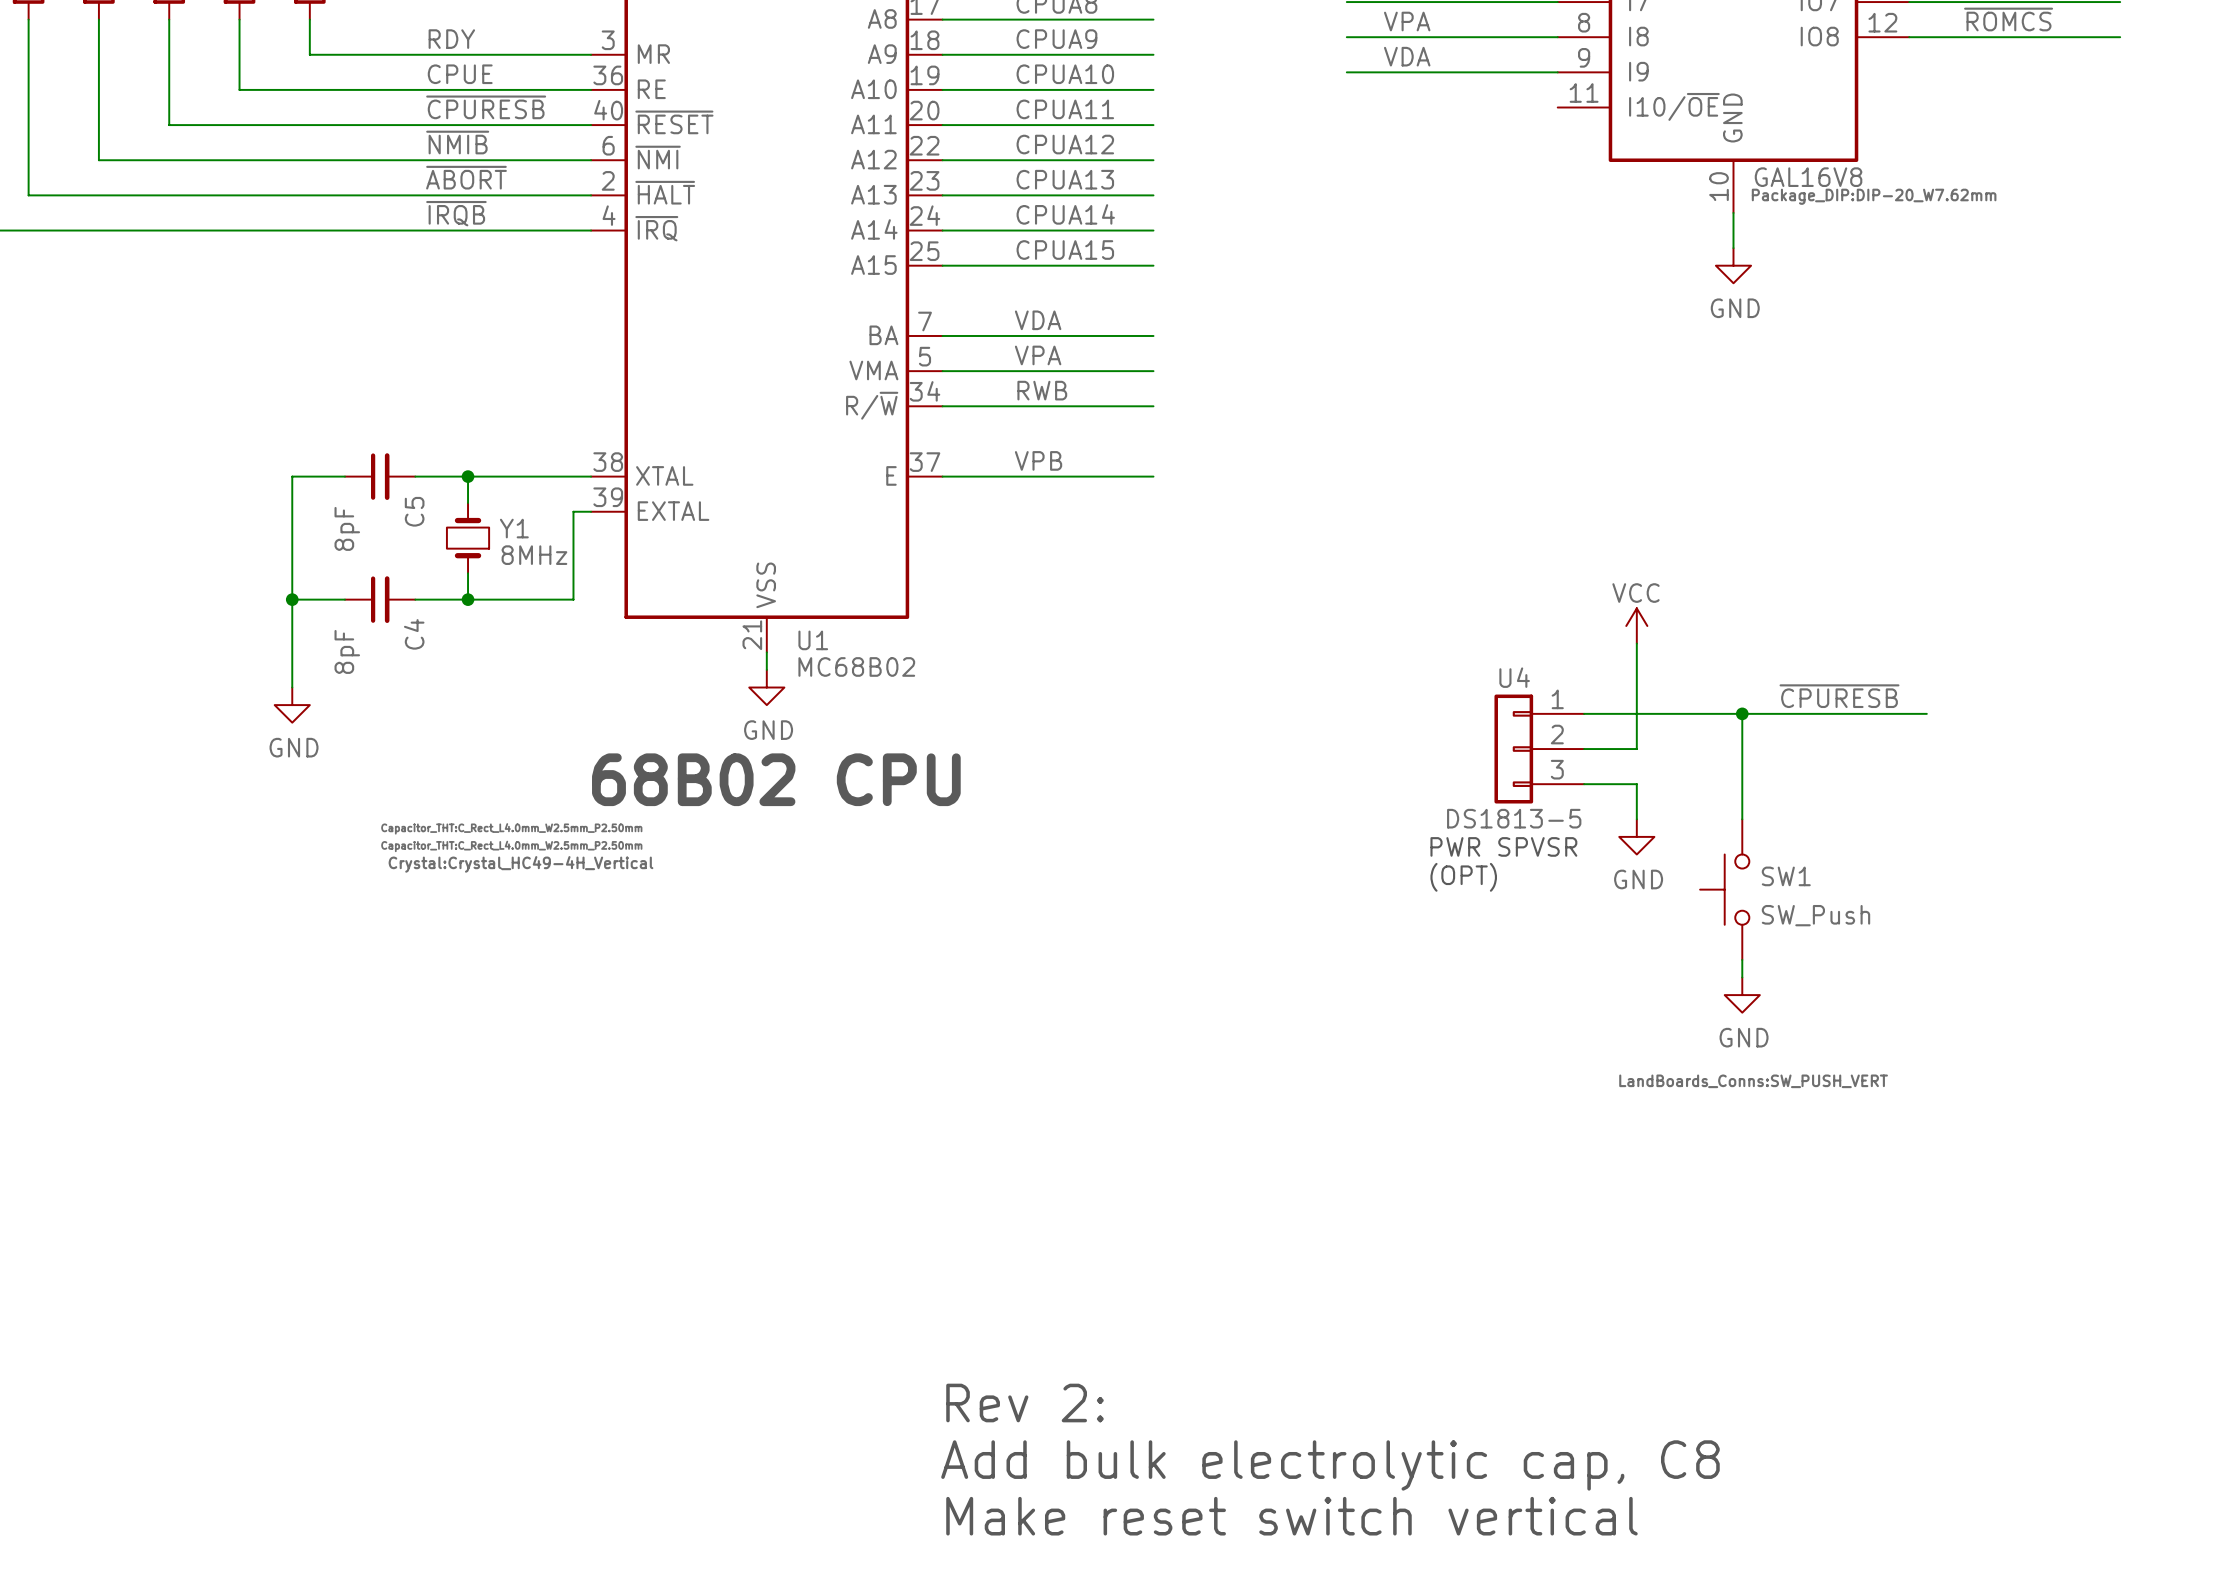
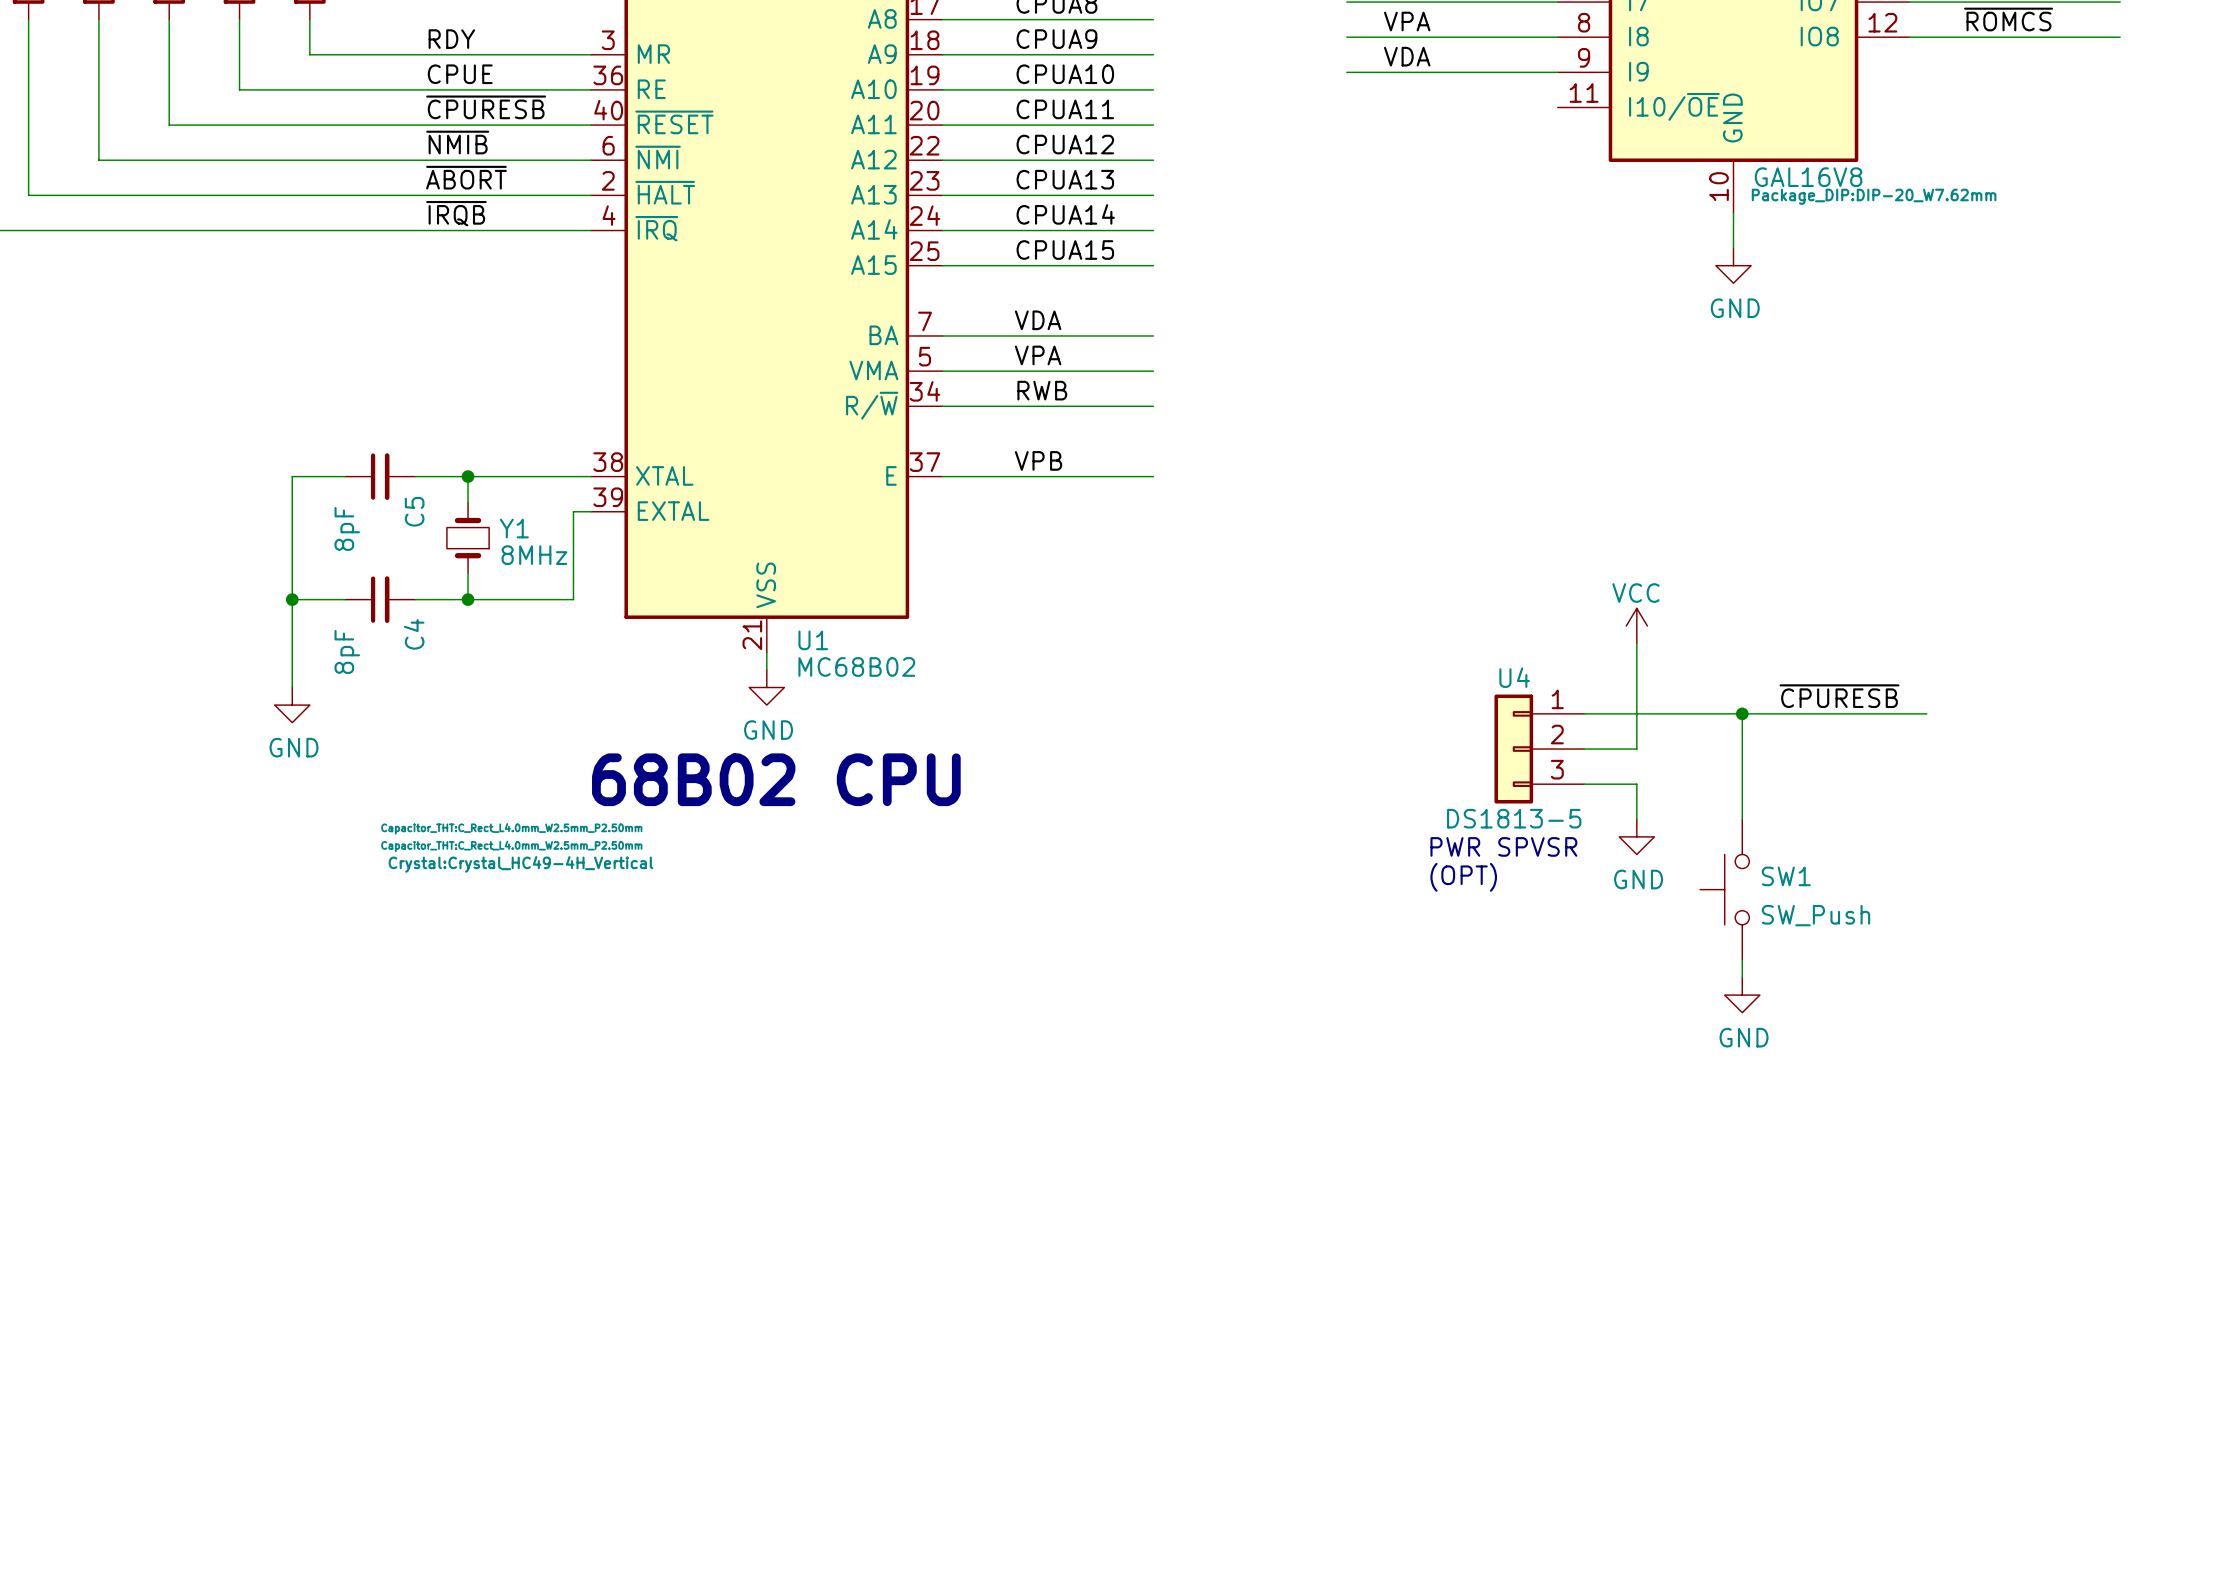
SW1 text: LandBoards_Conns:SW_PUSH_VERT (1753, 1081) -> none
text: Rev 2: (1024, 1403) -> none
text: Add bulk electrolytic cap, C8 (1330, 1465) -> none
text: Make reset switch vertical (1291, 1516) -> none

